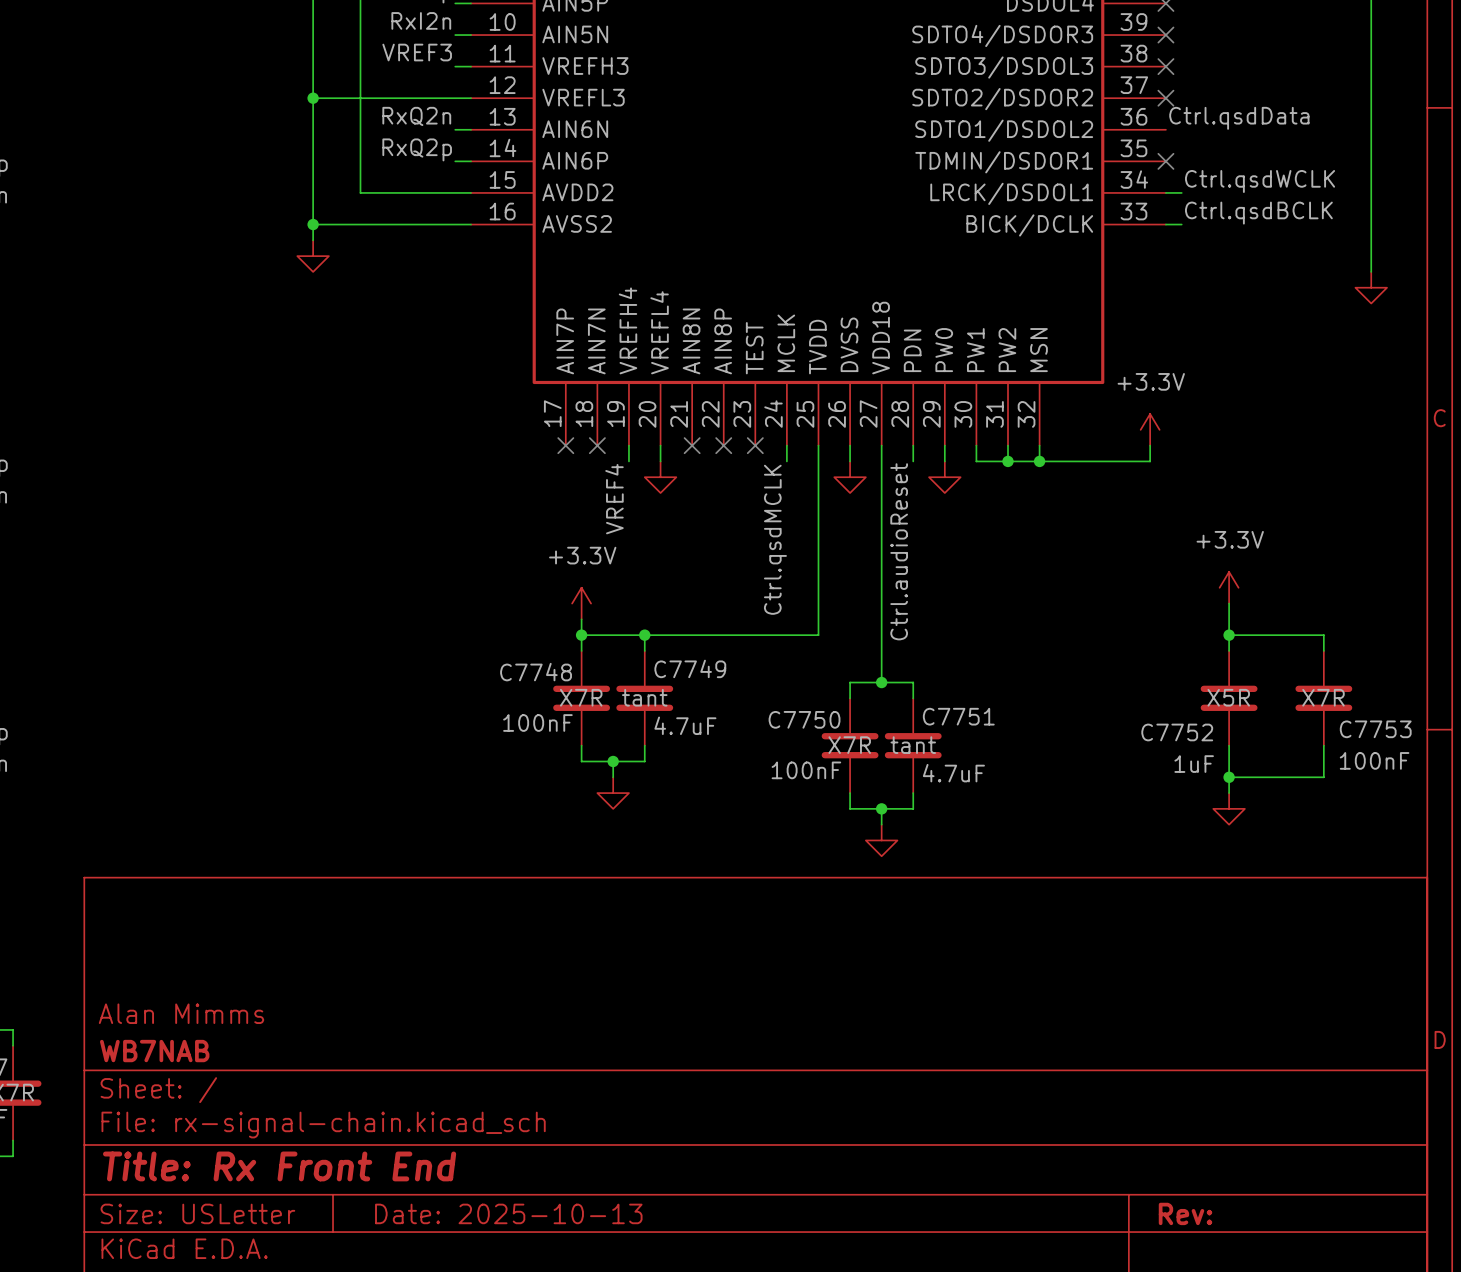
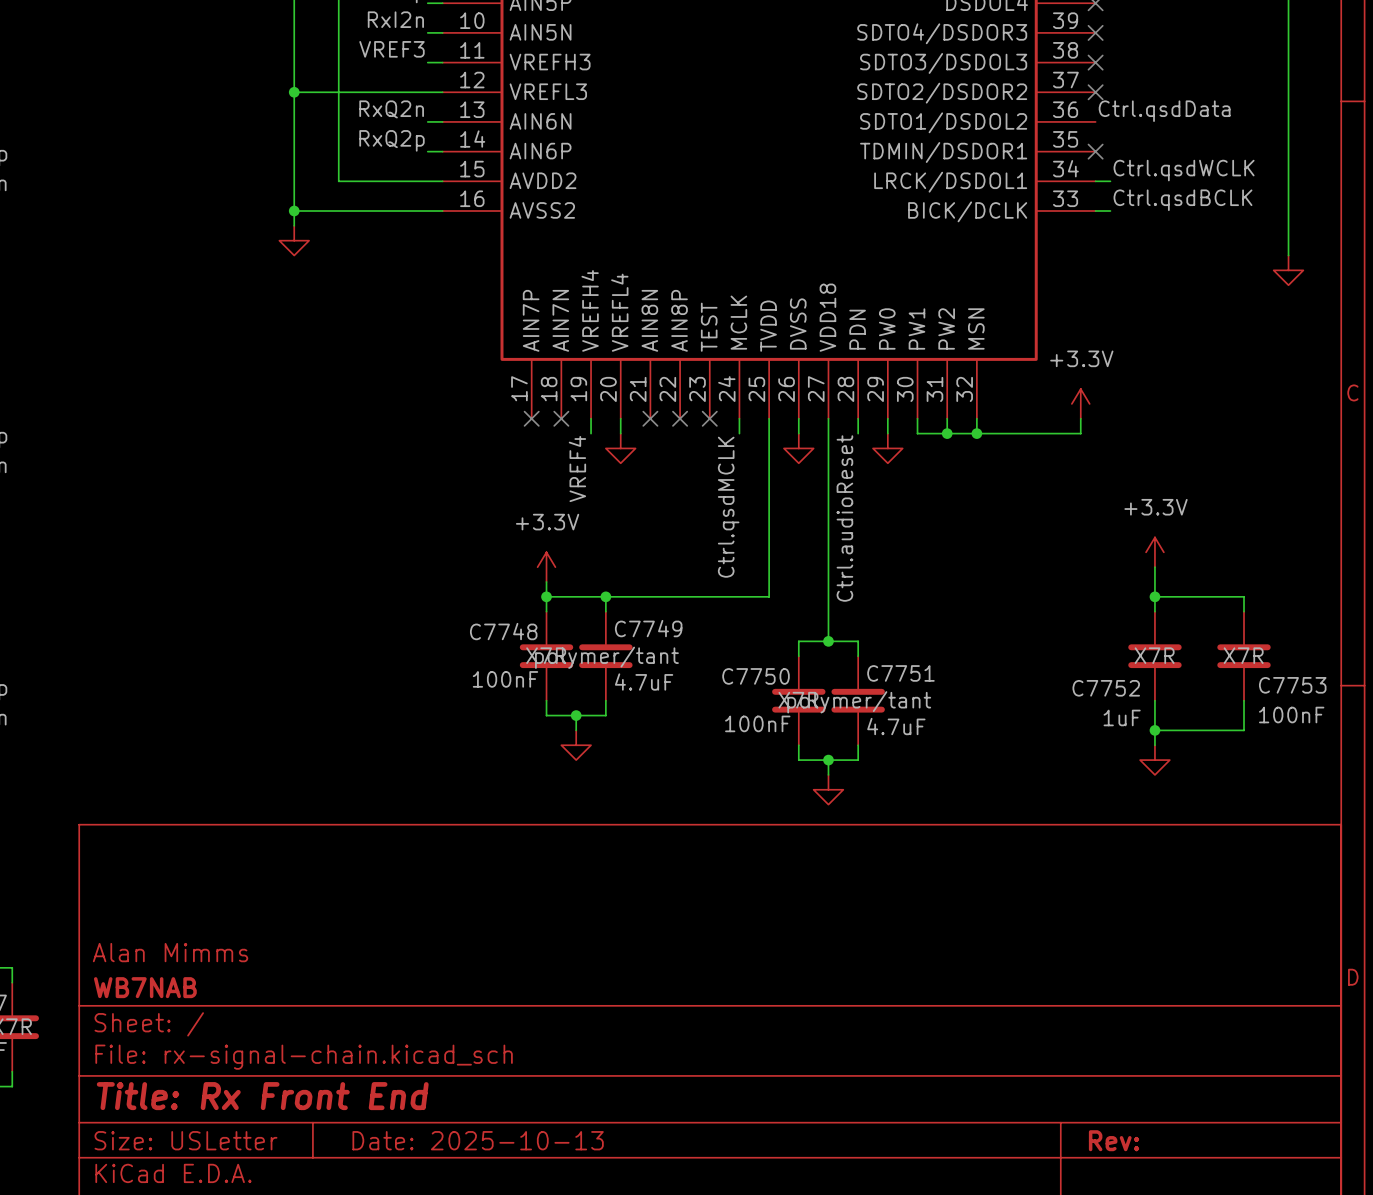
C7749 text: tant (644, 697) -> polymer/tant (606, 657)
C7752 text: X5R (1228, 697) -> X7R (1154, 655)
C7751 text: tant (913, 745) -> polymer/tant (859, 702)

